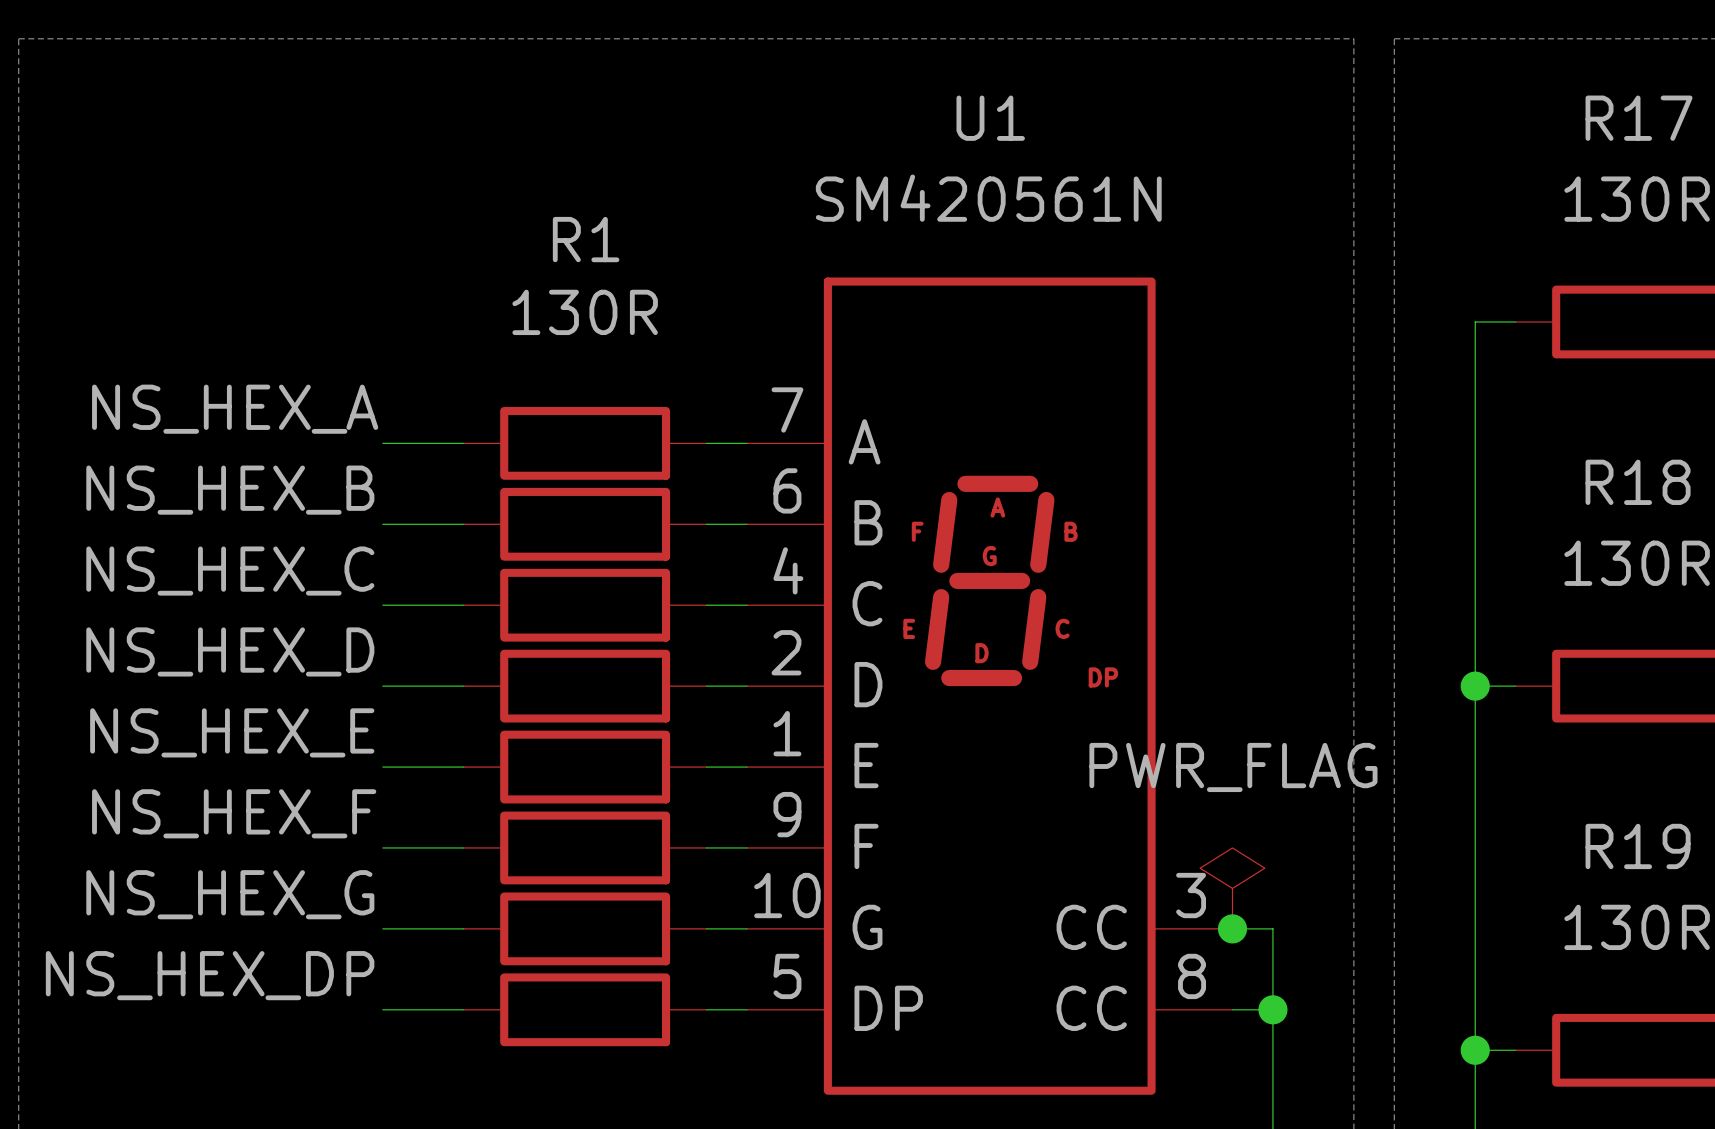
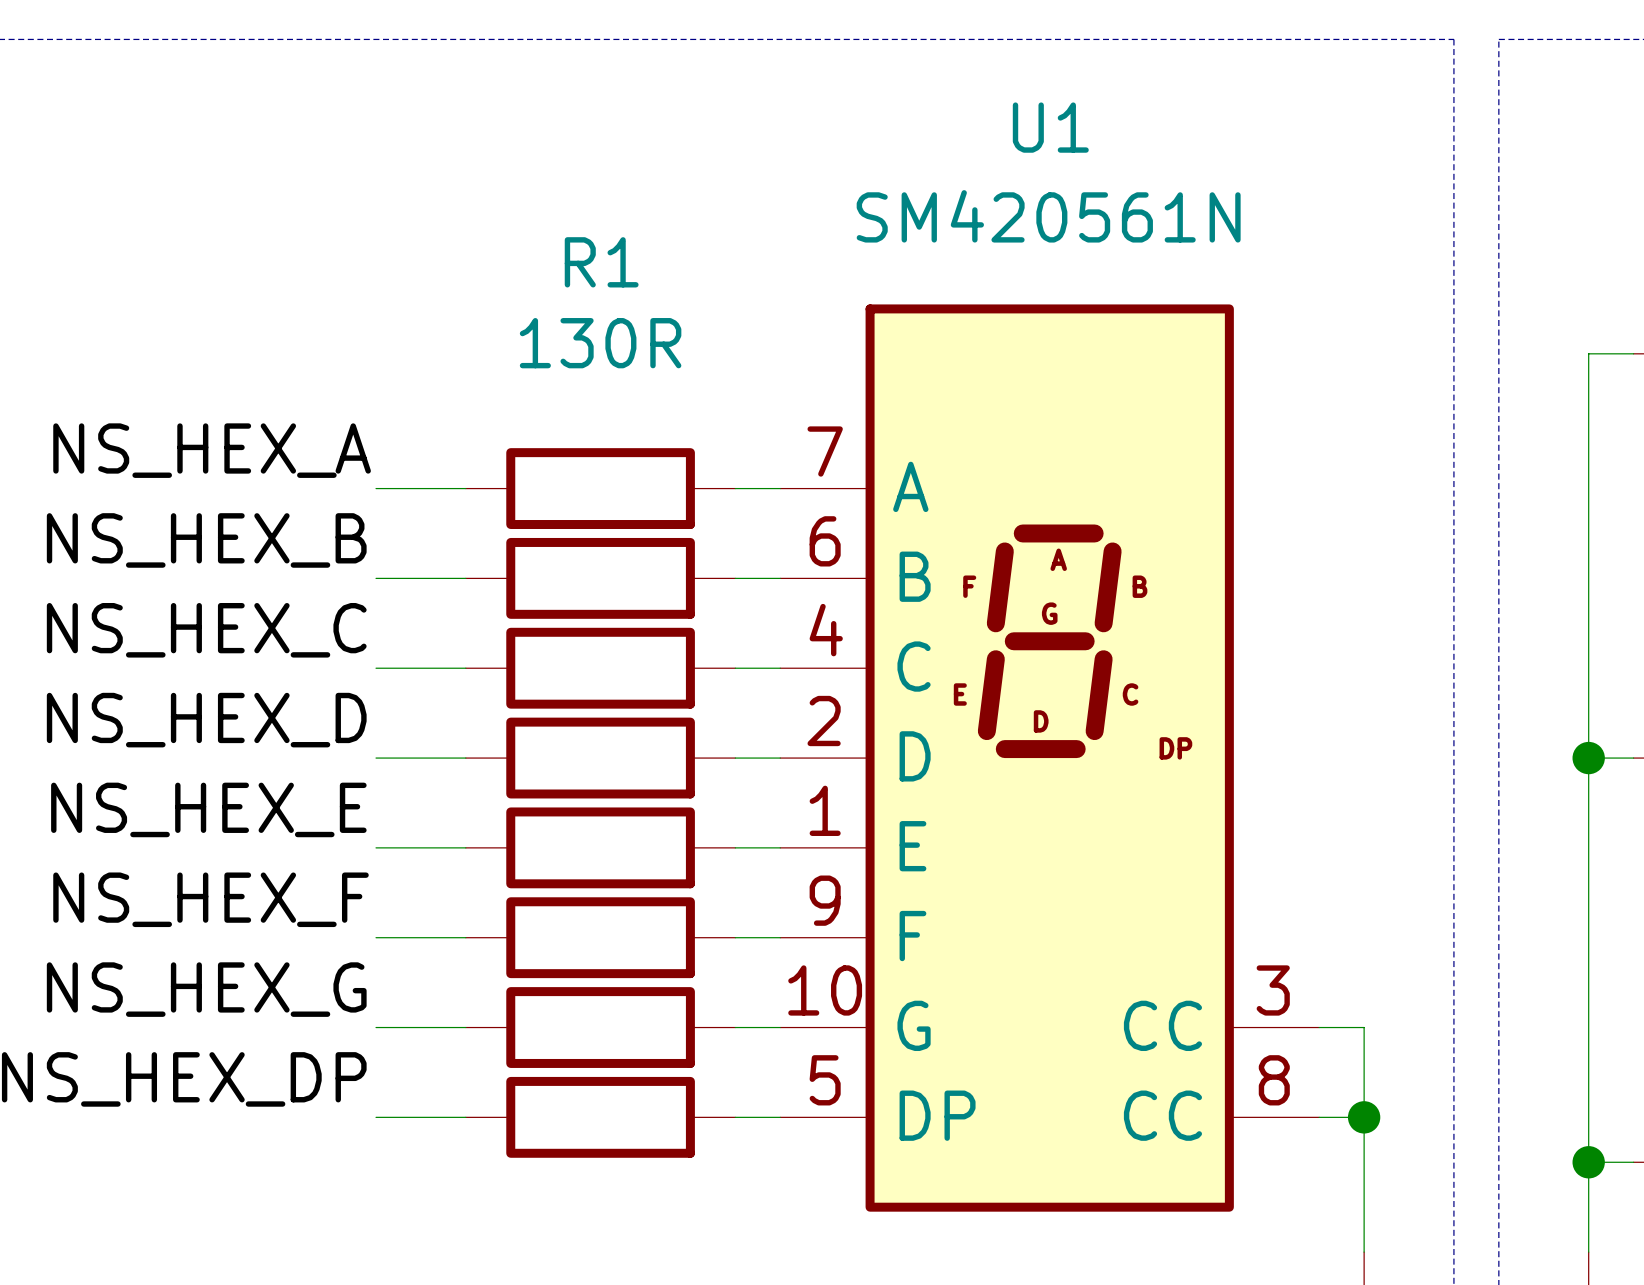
power symbol: PWR_FLAG (1232, 888) -> none
junction: (1232, 928) -> none

